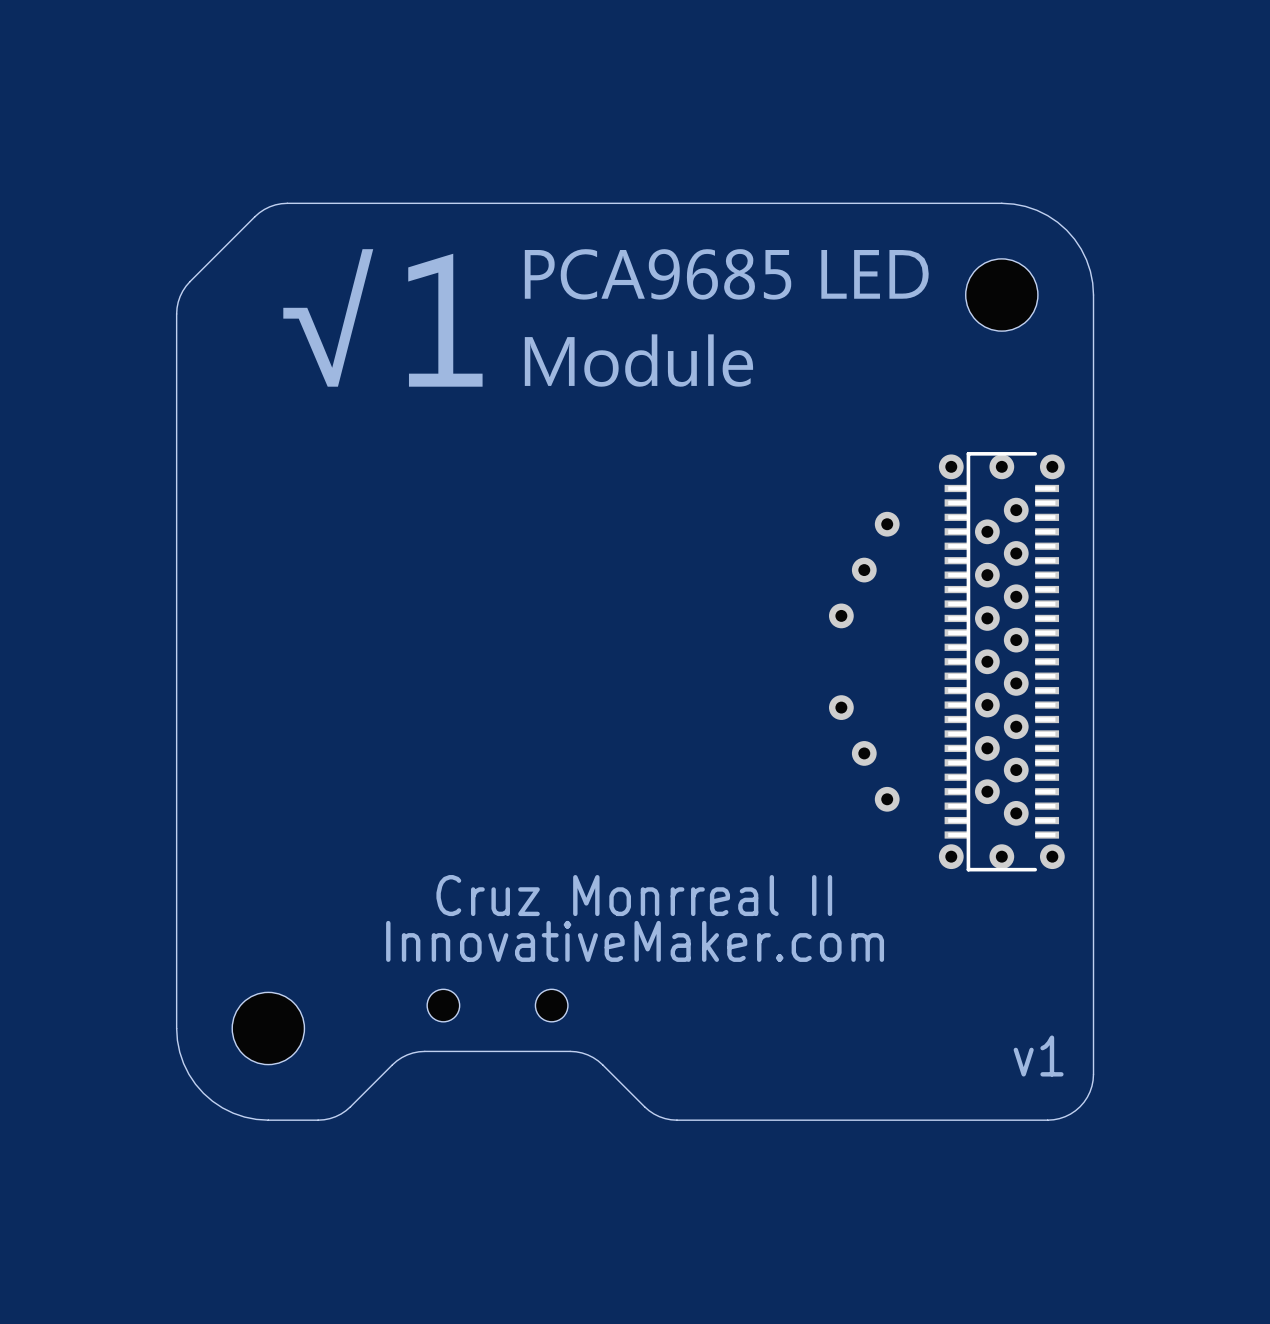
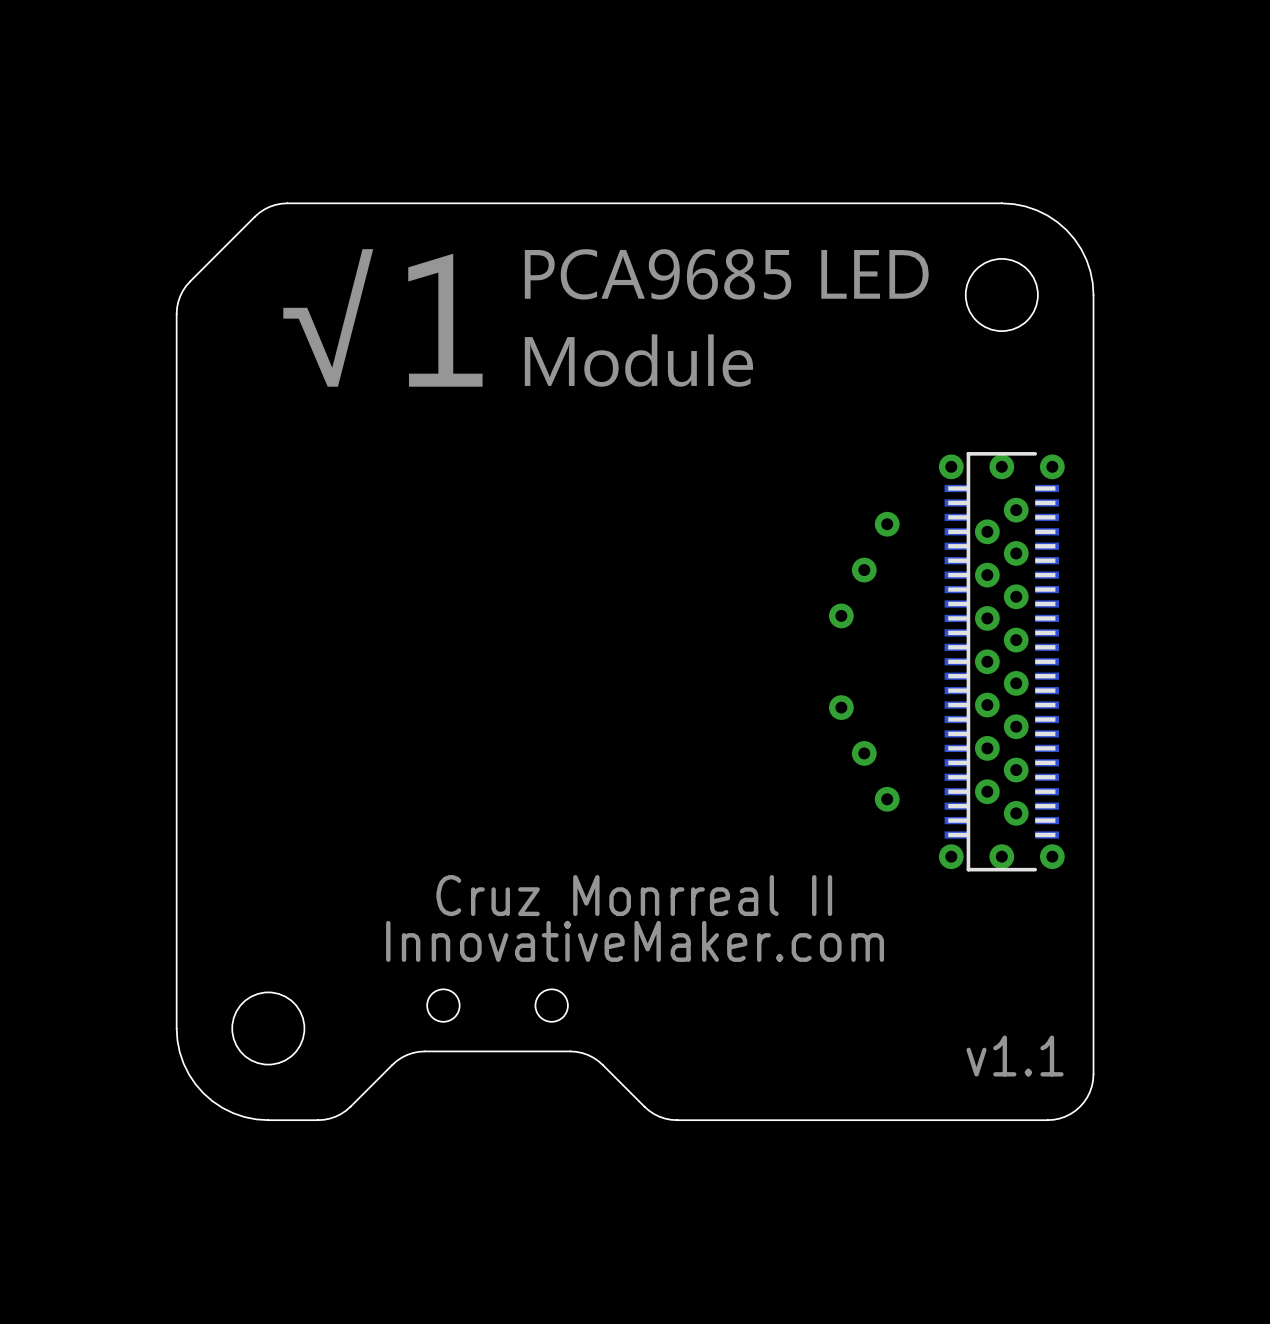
text: v1 (1038, 1056) -> v1.1 (1015, 1056)

